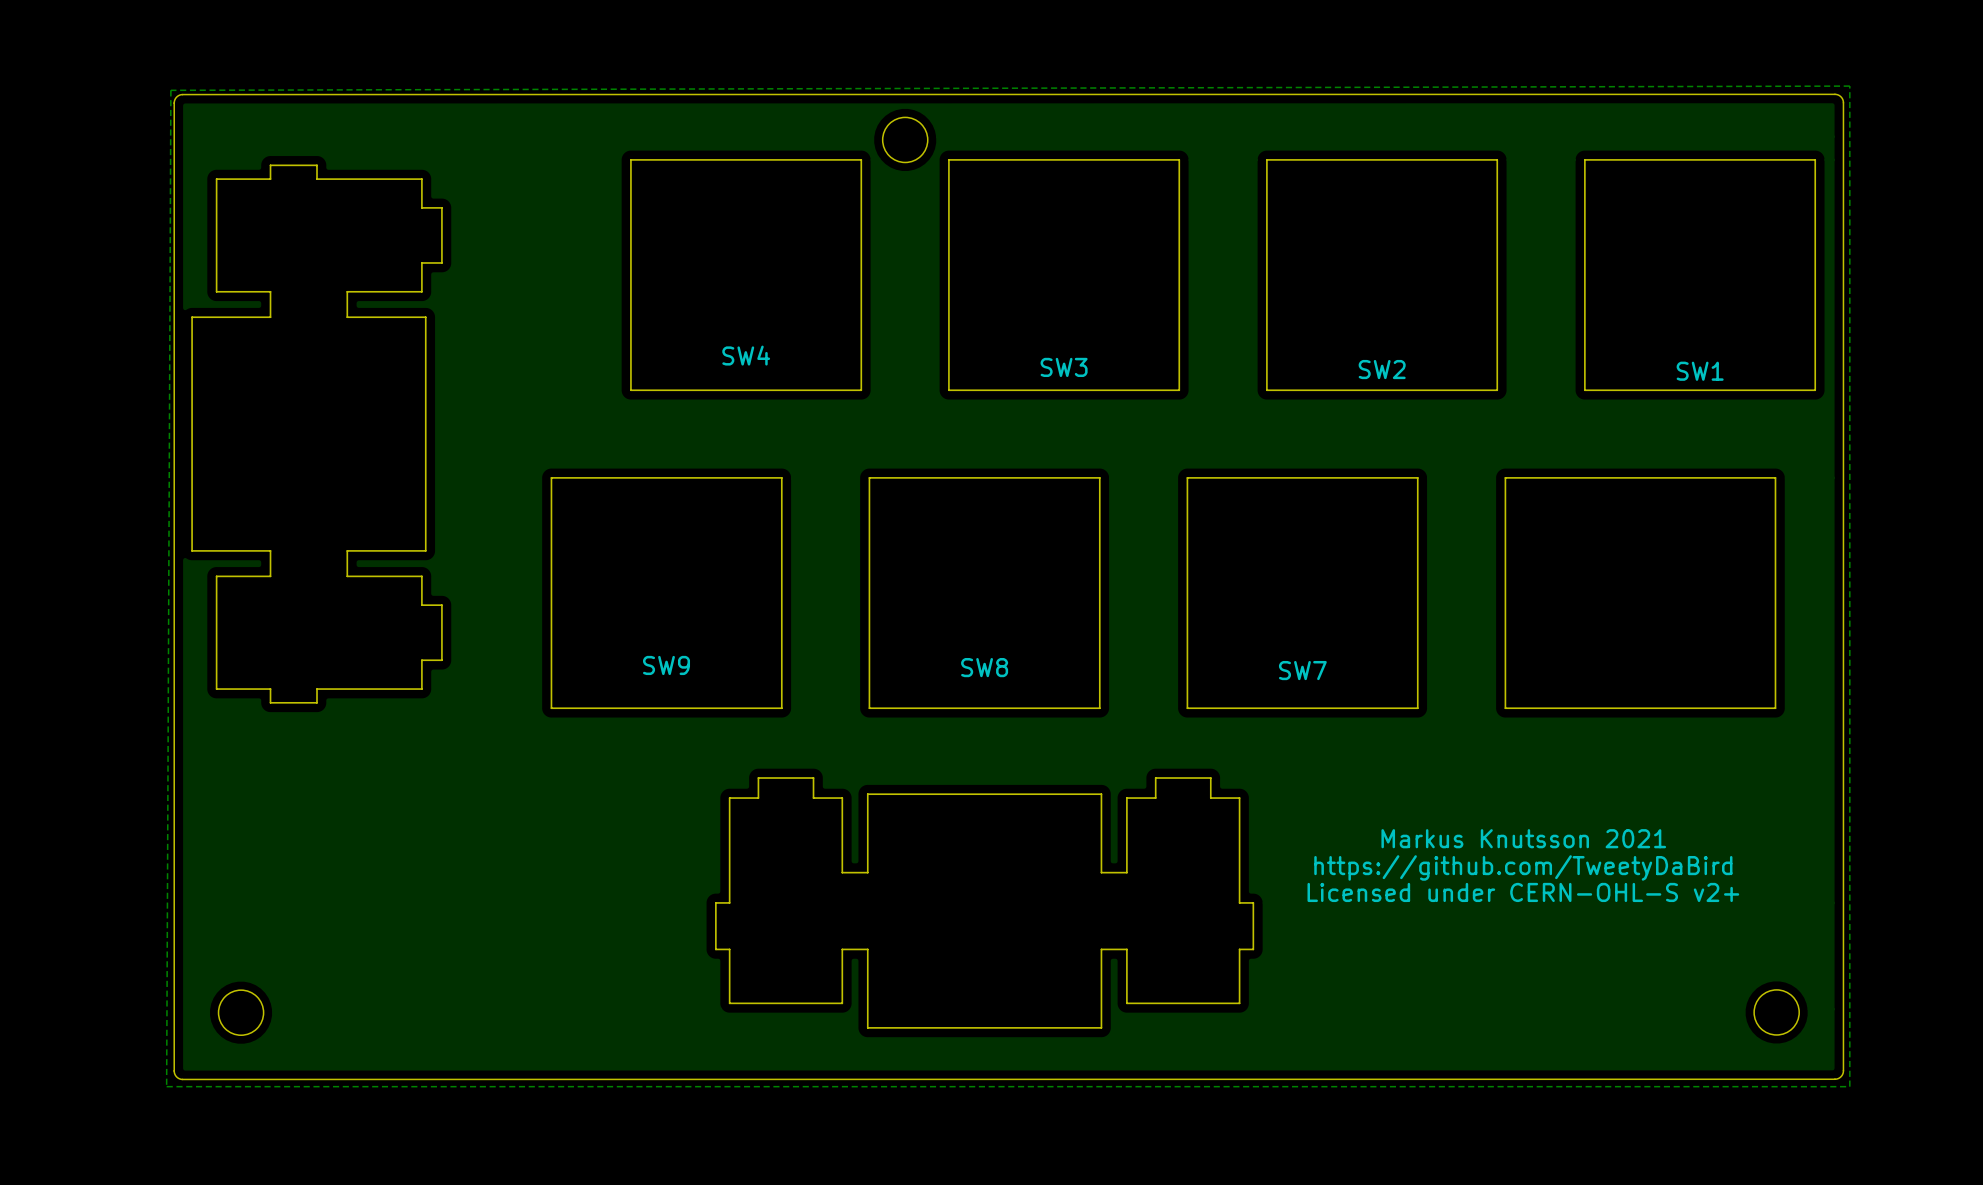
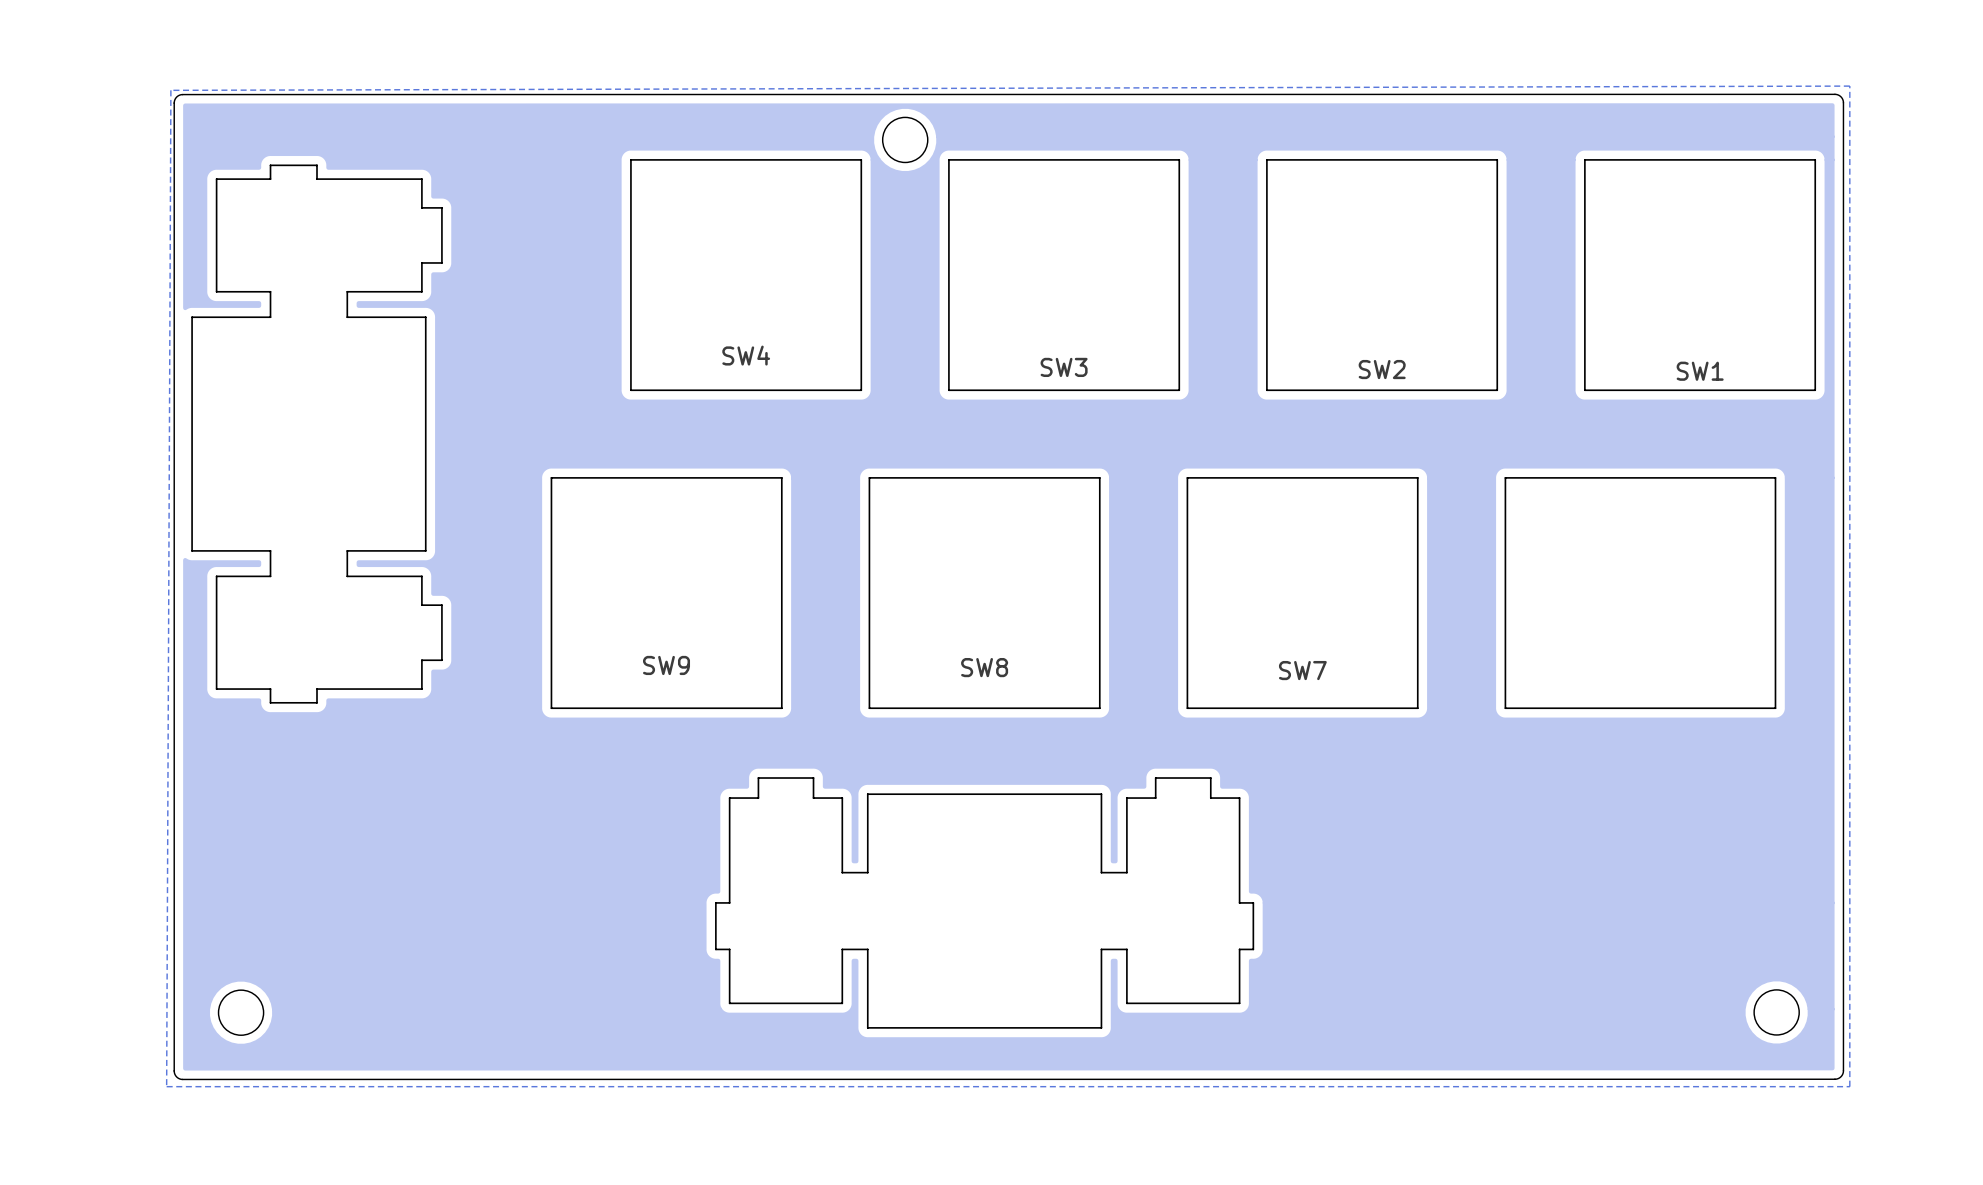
text: Markus Knutsson 2021 (1523, 838) -> none
text: https://github.com/TweetyDaBird (1523, 867) -> none
text: Licensed under CERN-OHL-S v2+ (1523, 892) -> none

